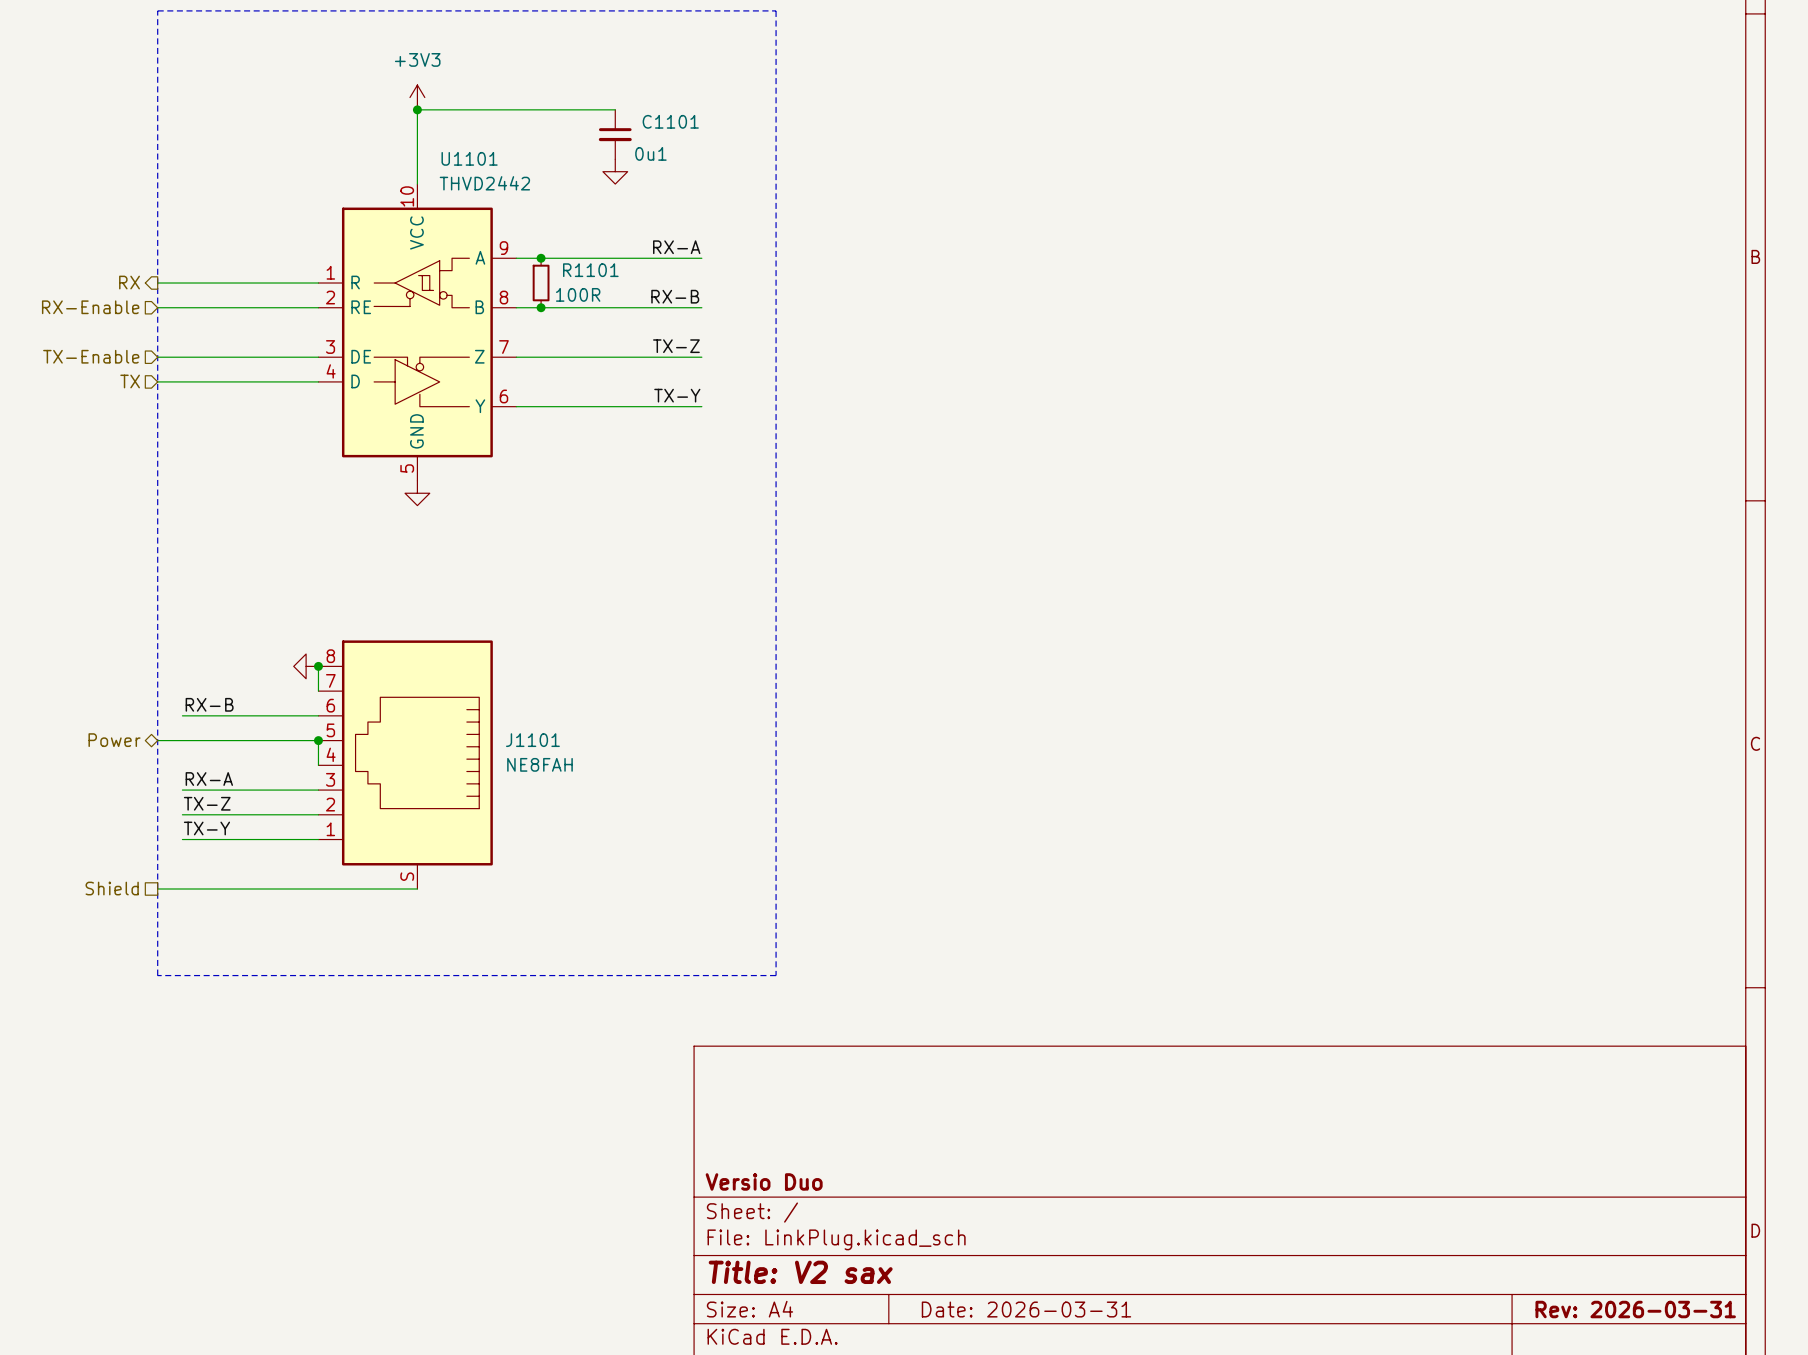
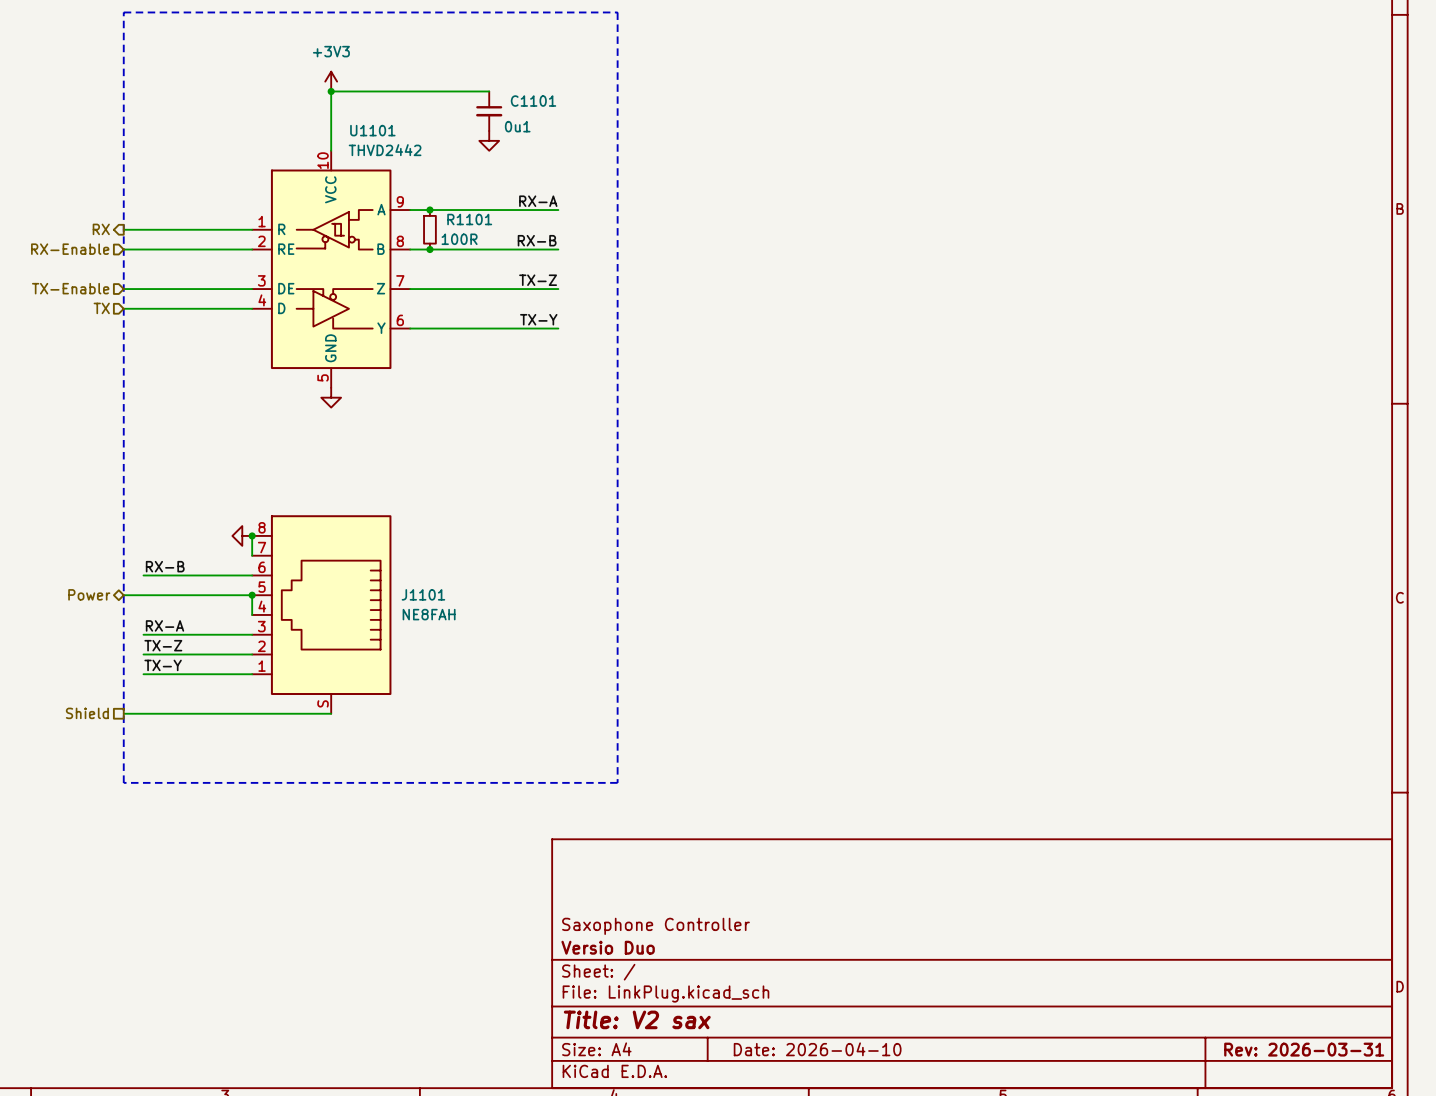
title block: none -> Saxophone Controller (655, 926)
title block: Date: 2026-03-31 (1026, 1309) -> Date: 2026-04-10 (817, 1049)

